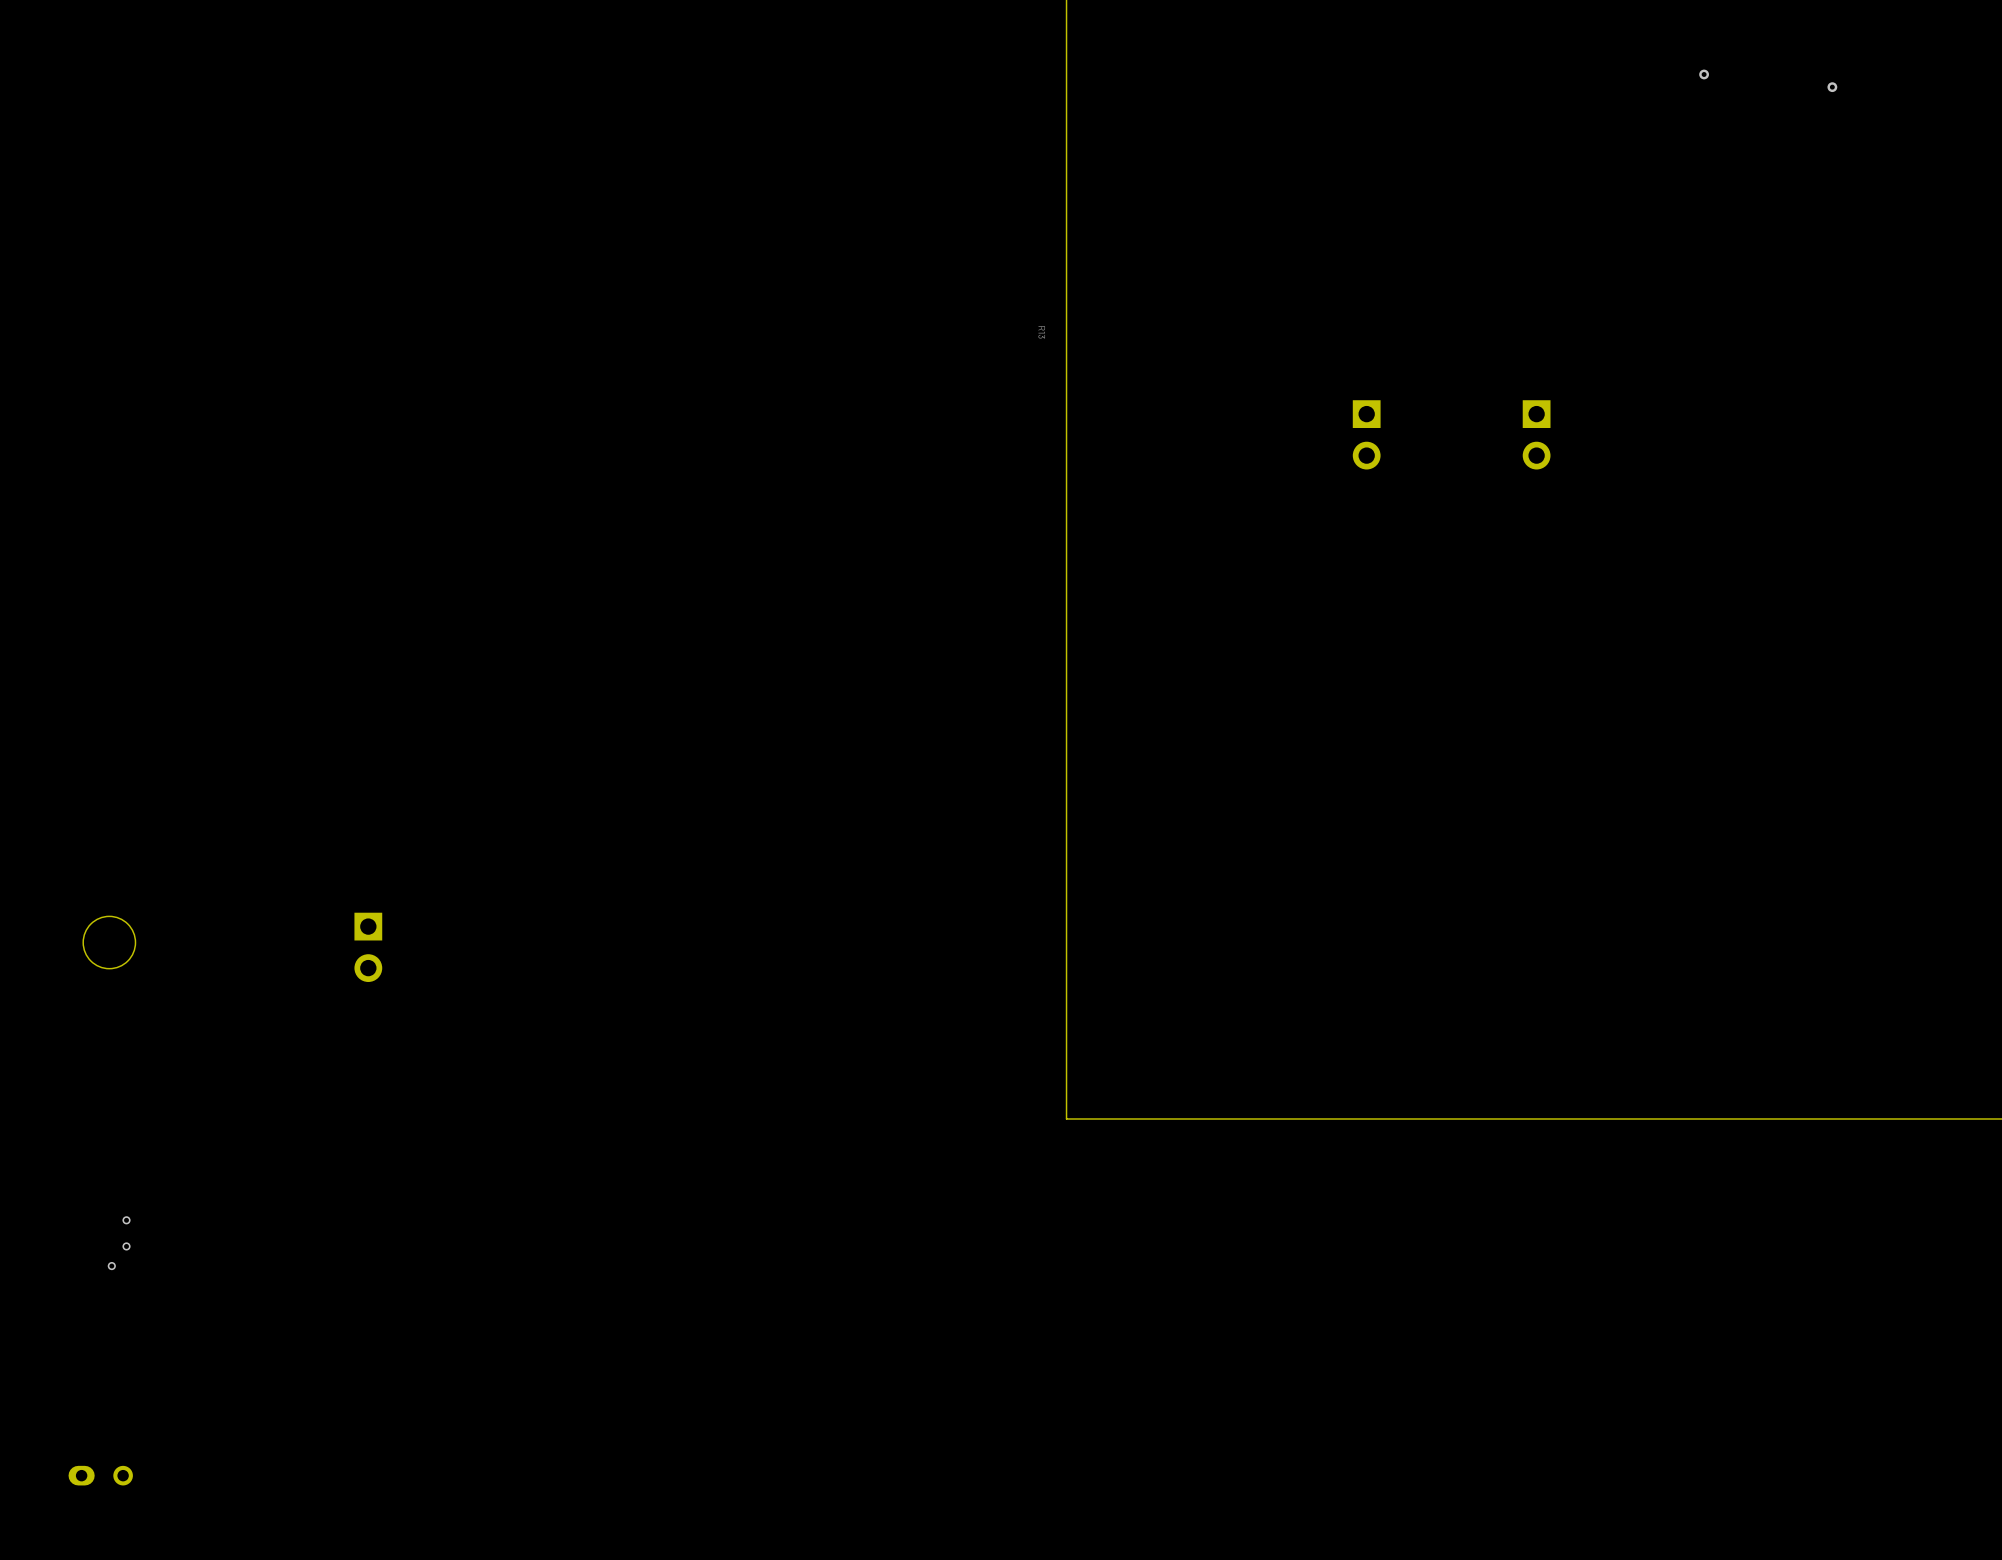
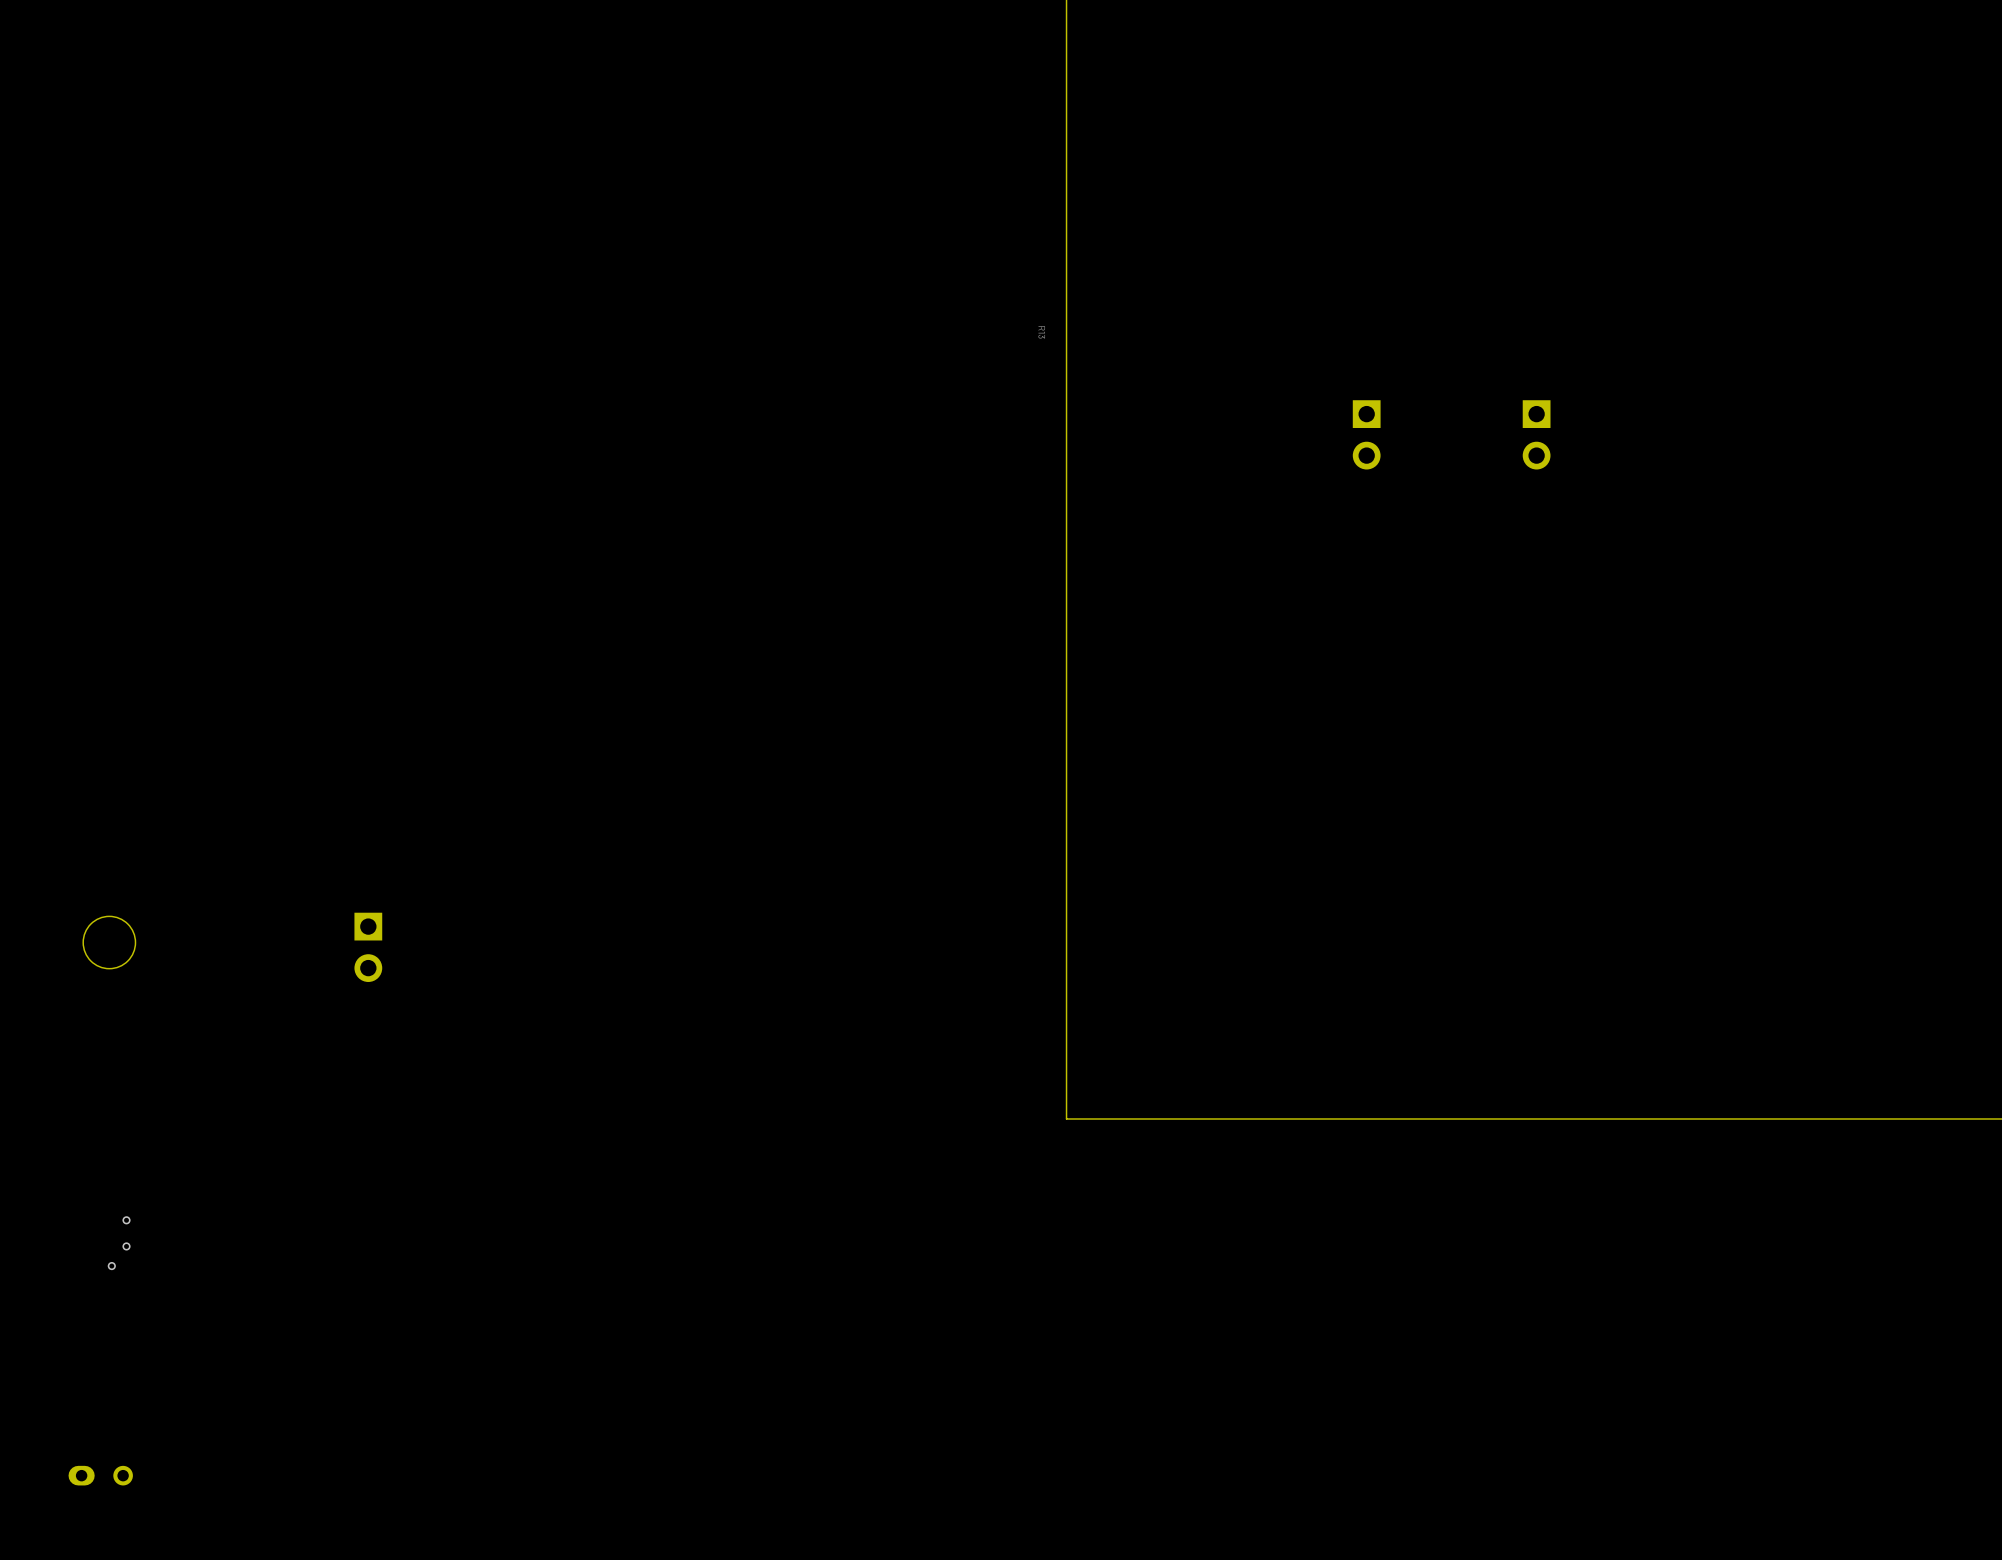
via: (1704, 74) -> none
via: (1832, 87) -> none

